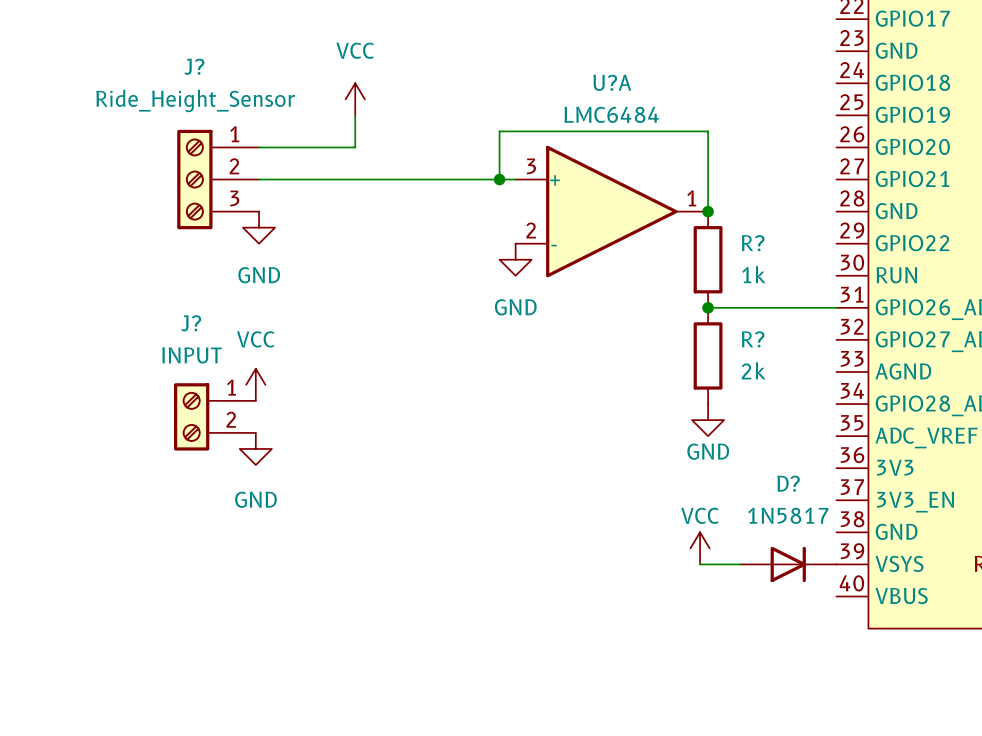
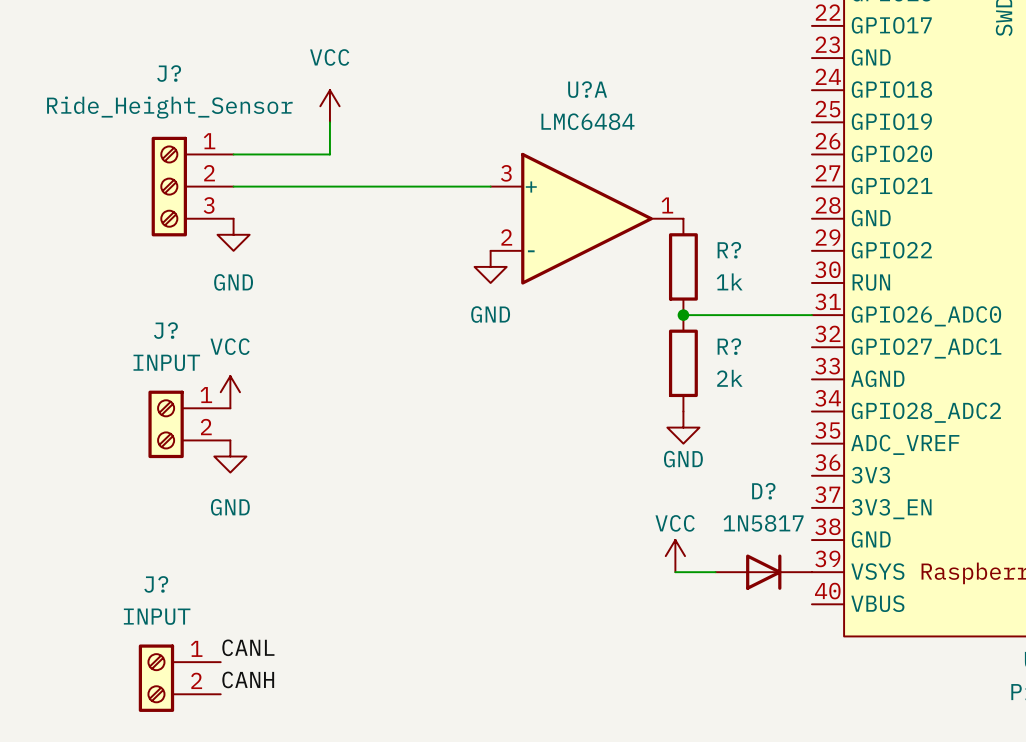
wire: (499, 179) (499, 131) (708, 131) (708, 211) -> none
junction: (499, 179) -> none
junction: (708, 211) -> none
label: none -> CANL (248, 647)
J?: none -> INPUT (179, 678)
label: none -> CANH (248, 679)

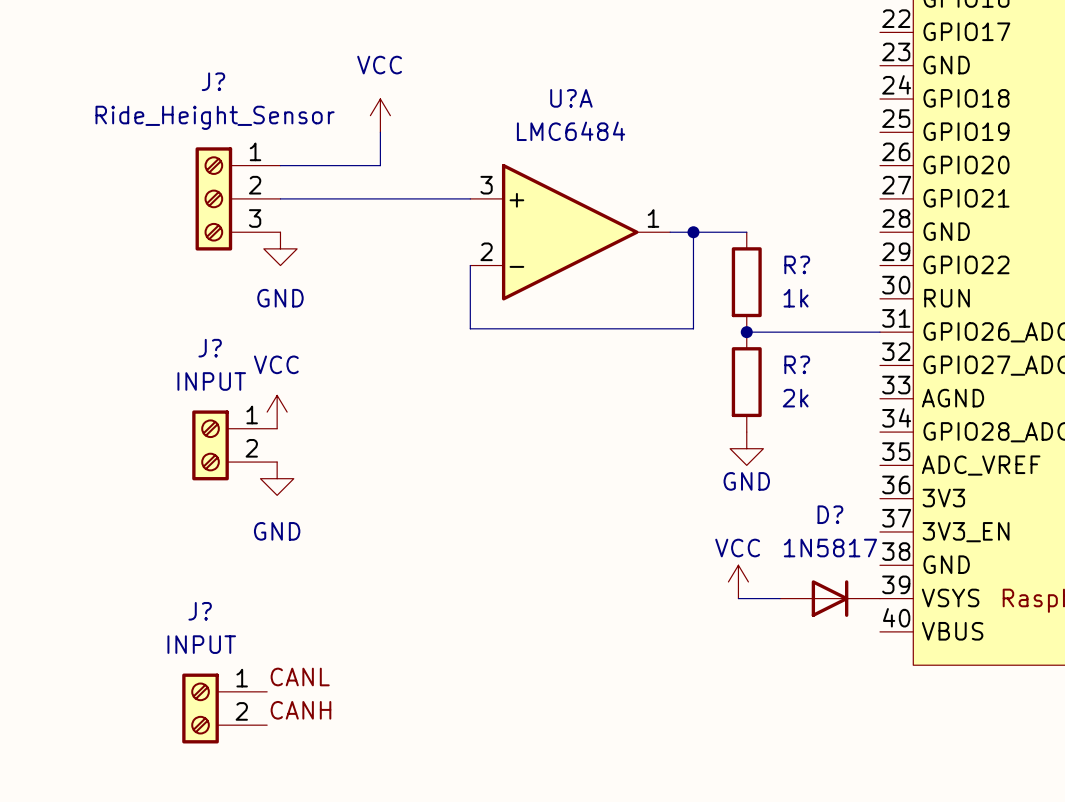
U?A position: (587, 218) -> (570, 232)
wire: none -> (693, 232) (693, 328) (470, 328) (470, 265)
junction: none -> (693, 232)
power symbol: GND (490, 266) -> none

